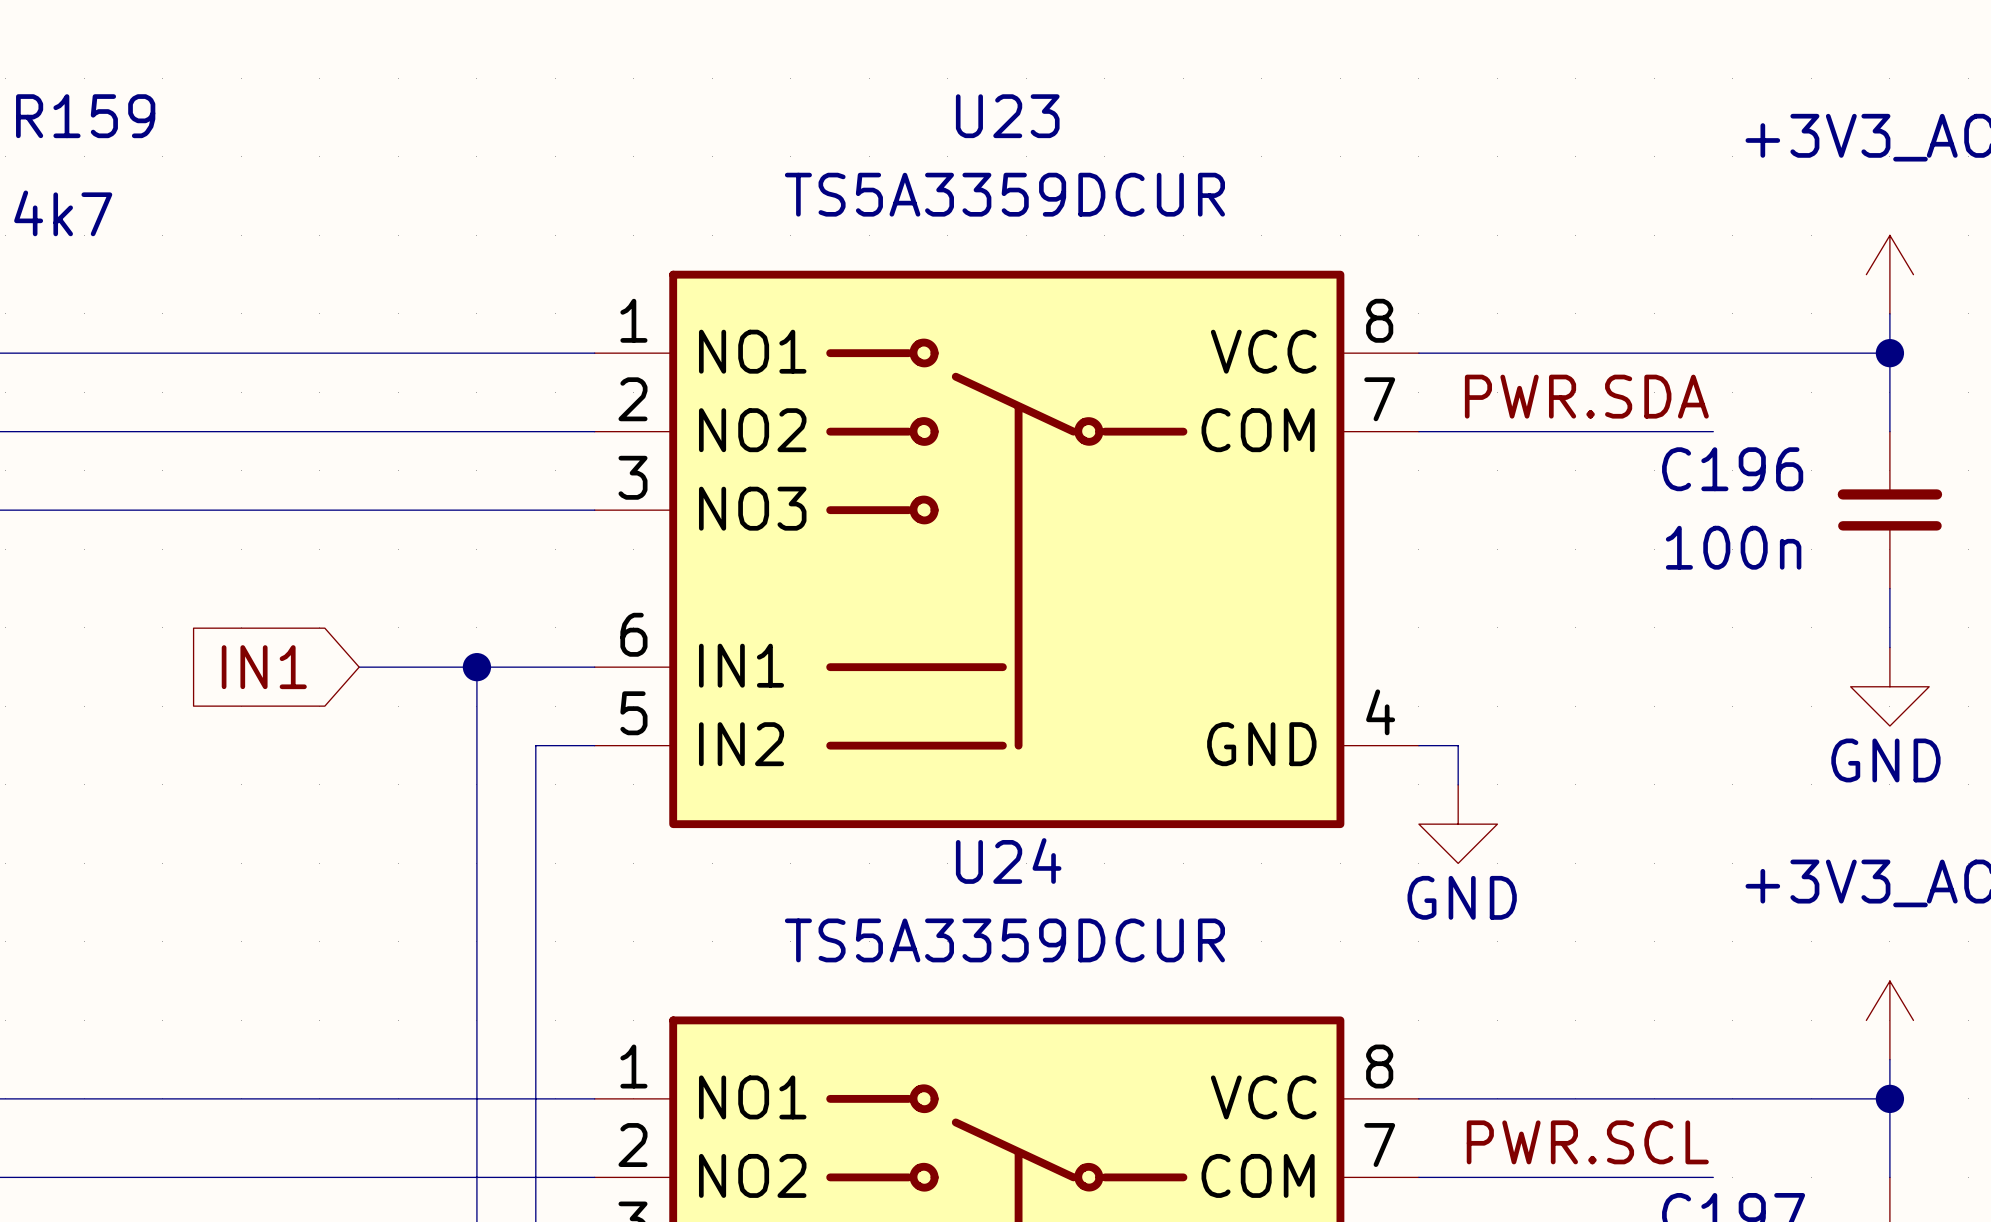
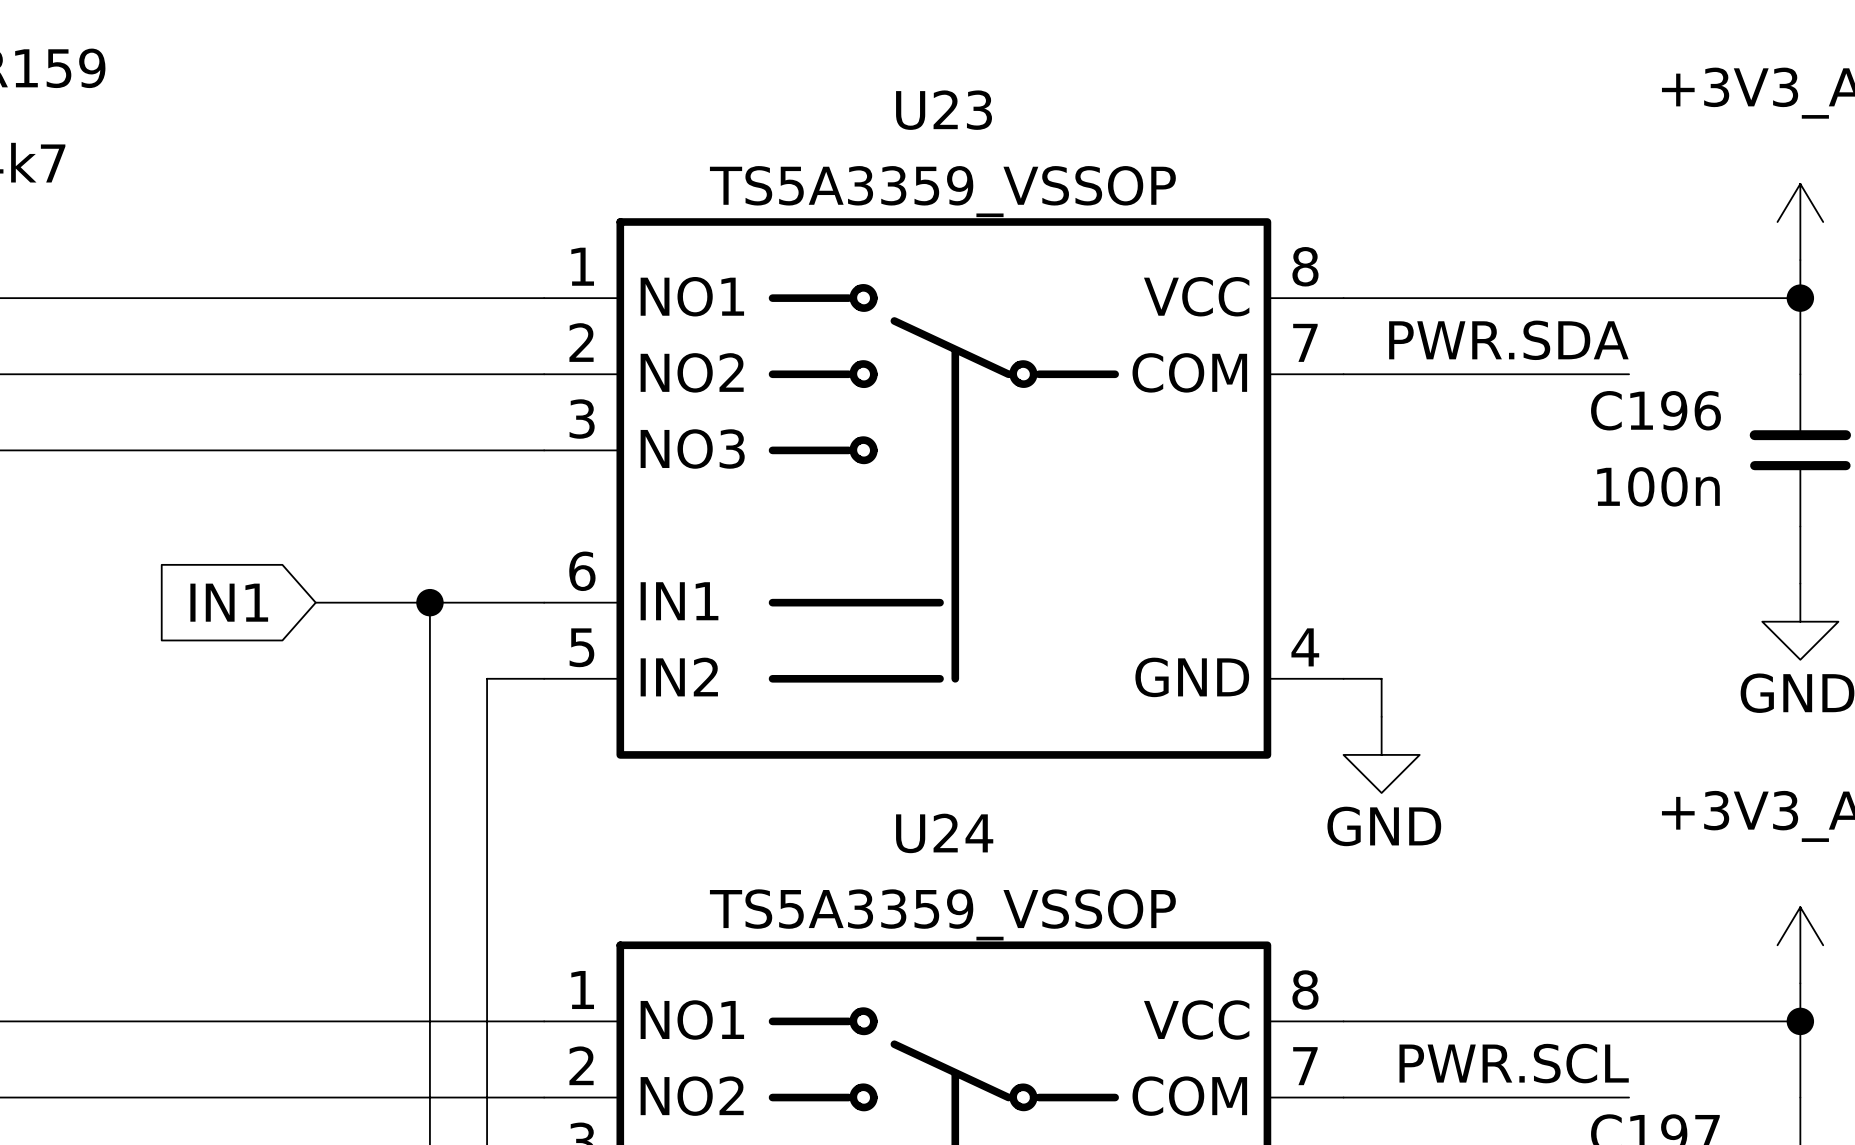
U23 name position: U23 (1007, 116) -> U23 (944, 110)
U23 text: TS5A3359DCUR (1004, 194) -> none
U23 value: none -> TS5A3359_VSSOP (942, 191)
U24 name position: U24 (1008, 860) -> U24 (944, 833)
U24 text: TS5A3359DCUR (1004, 940) -> none
U24 value: none -> TS5A3359_VSSOP (942, 914)

